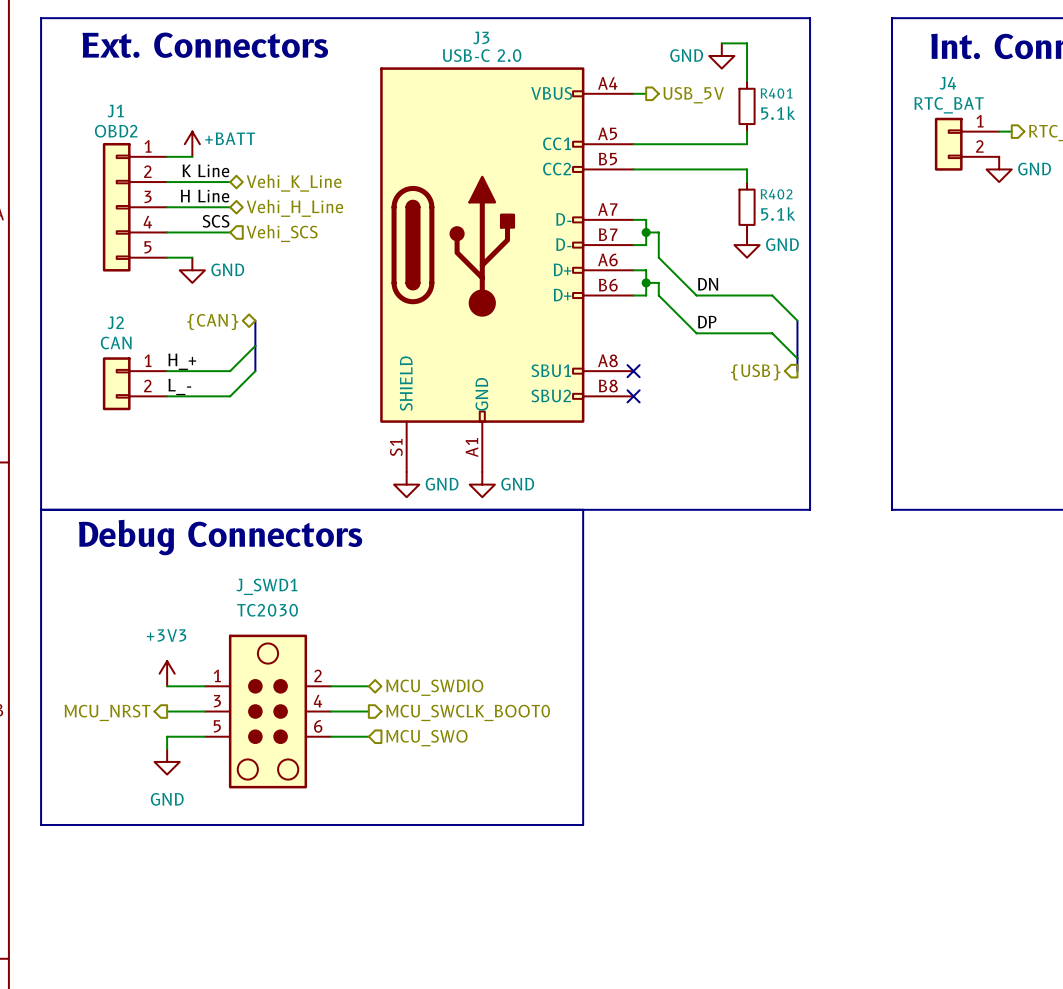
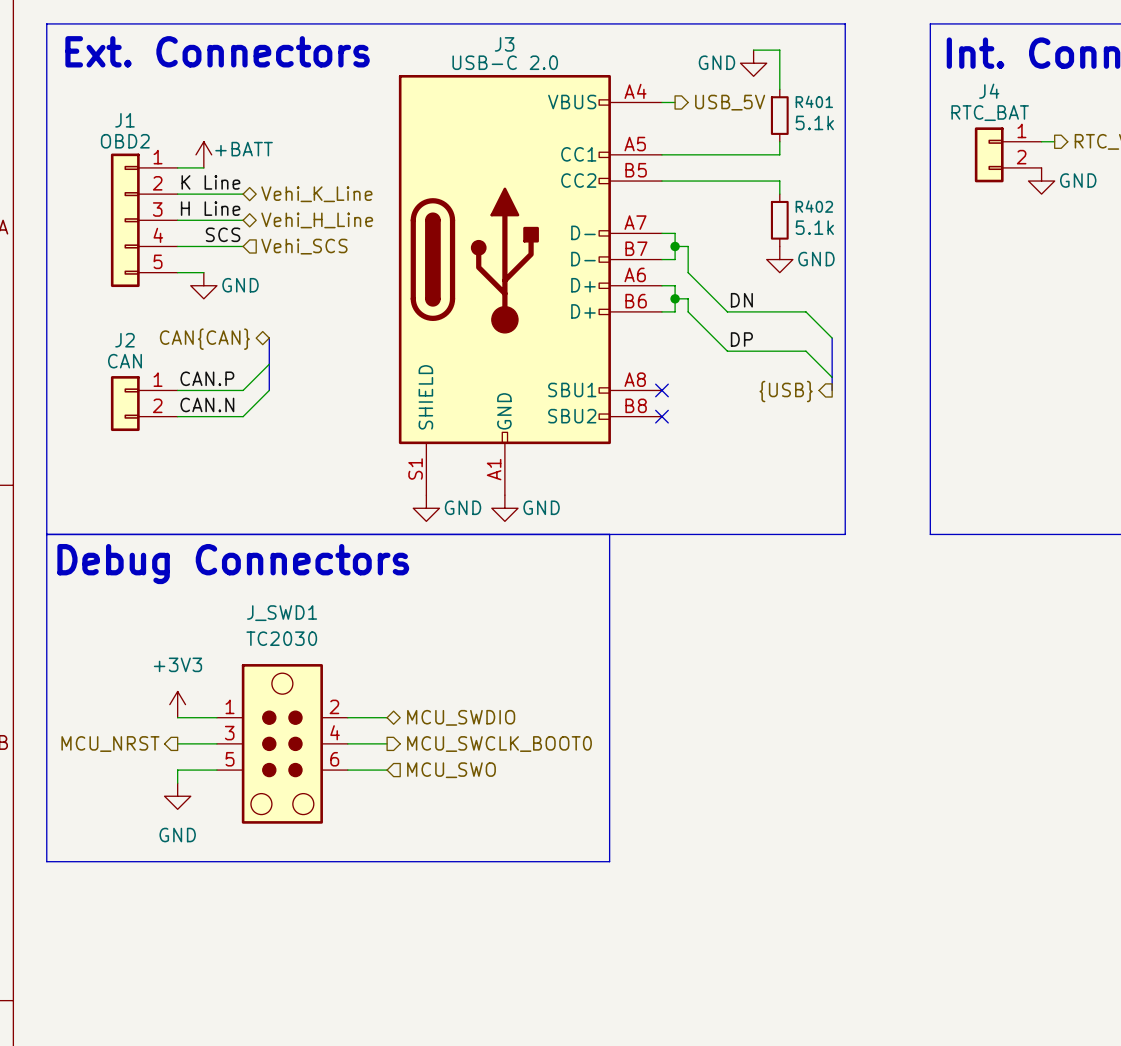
hierarchical label: {CAN} (212, 321) -> CAN{CAN} (204, 339)
label: H_+ (182, 361) -> CAN.P (207, 378)
label: L_- (179, 386) -> CAN.N (207, 404)

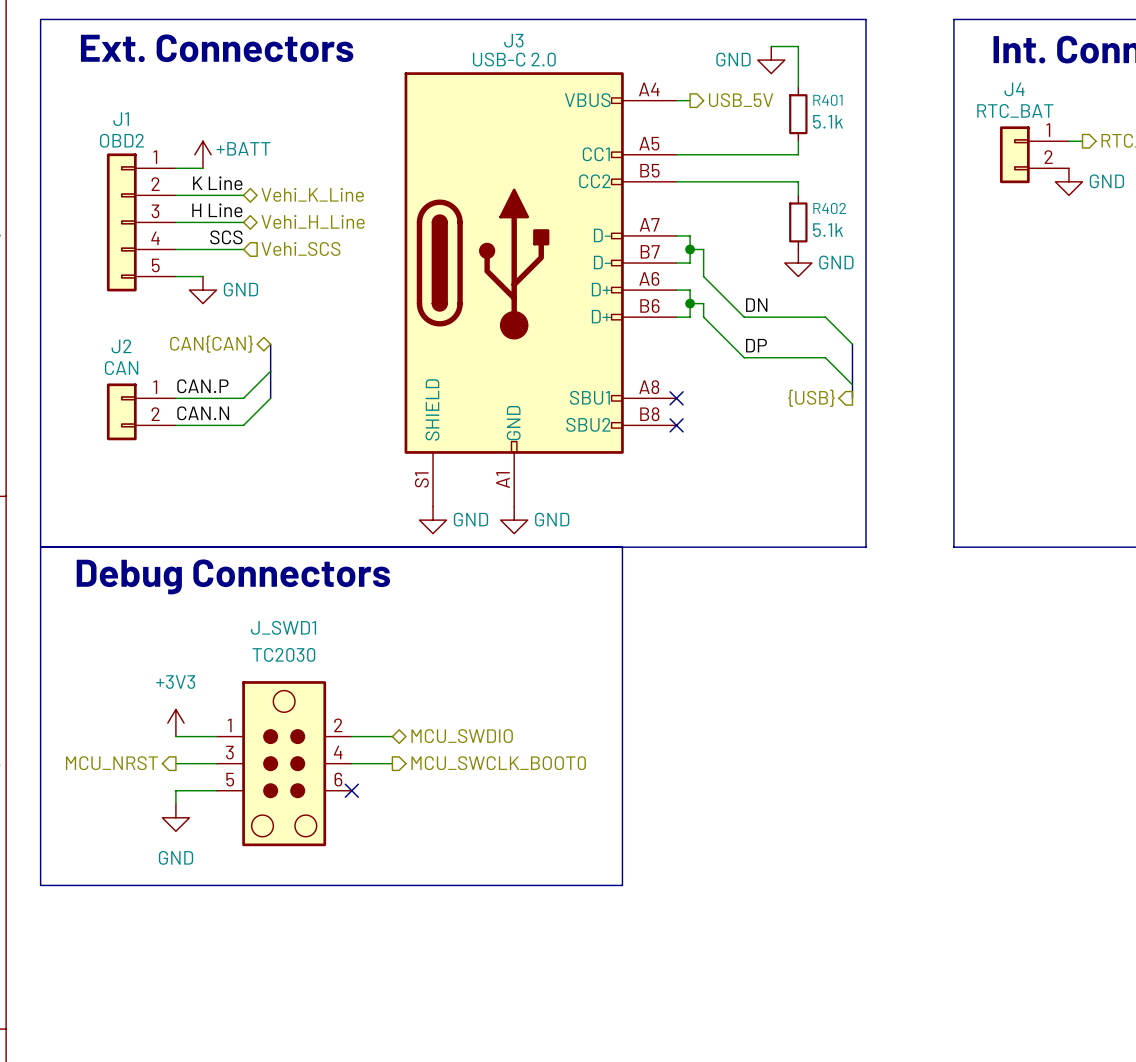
wire: (347, 770) (387, 770) -> none
no-connect mark: none -> (351, 790)
hierarchical label: MCU_SWO (451, 770) -> none

